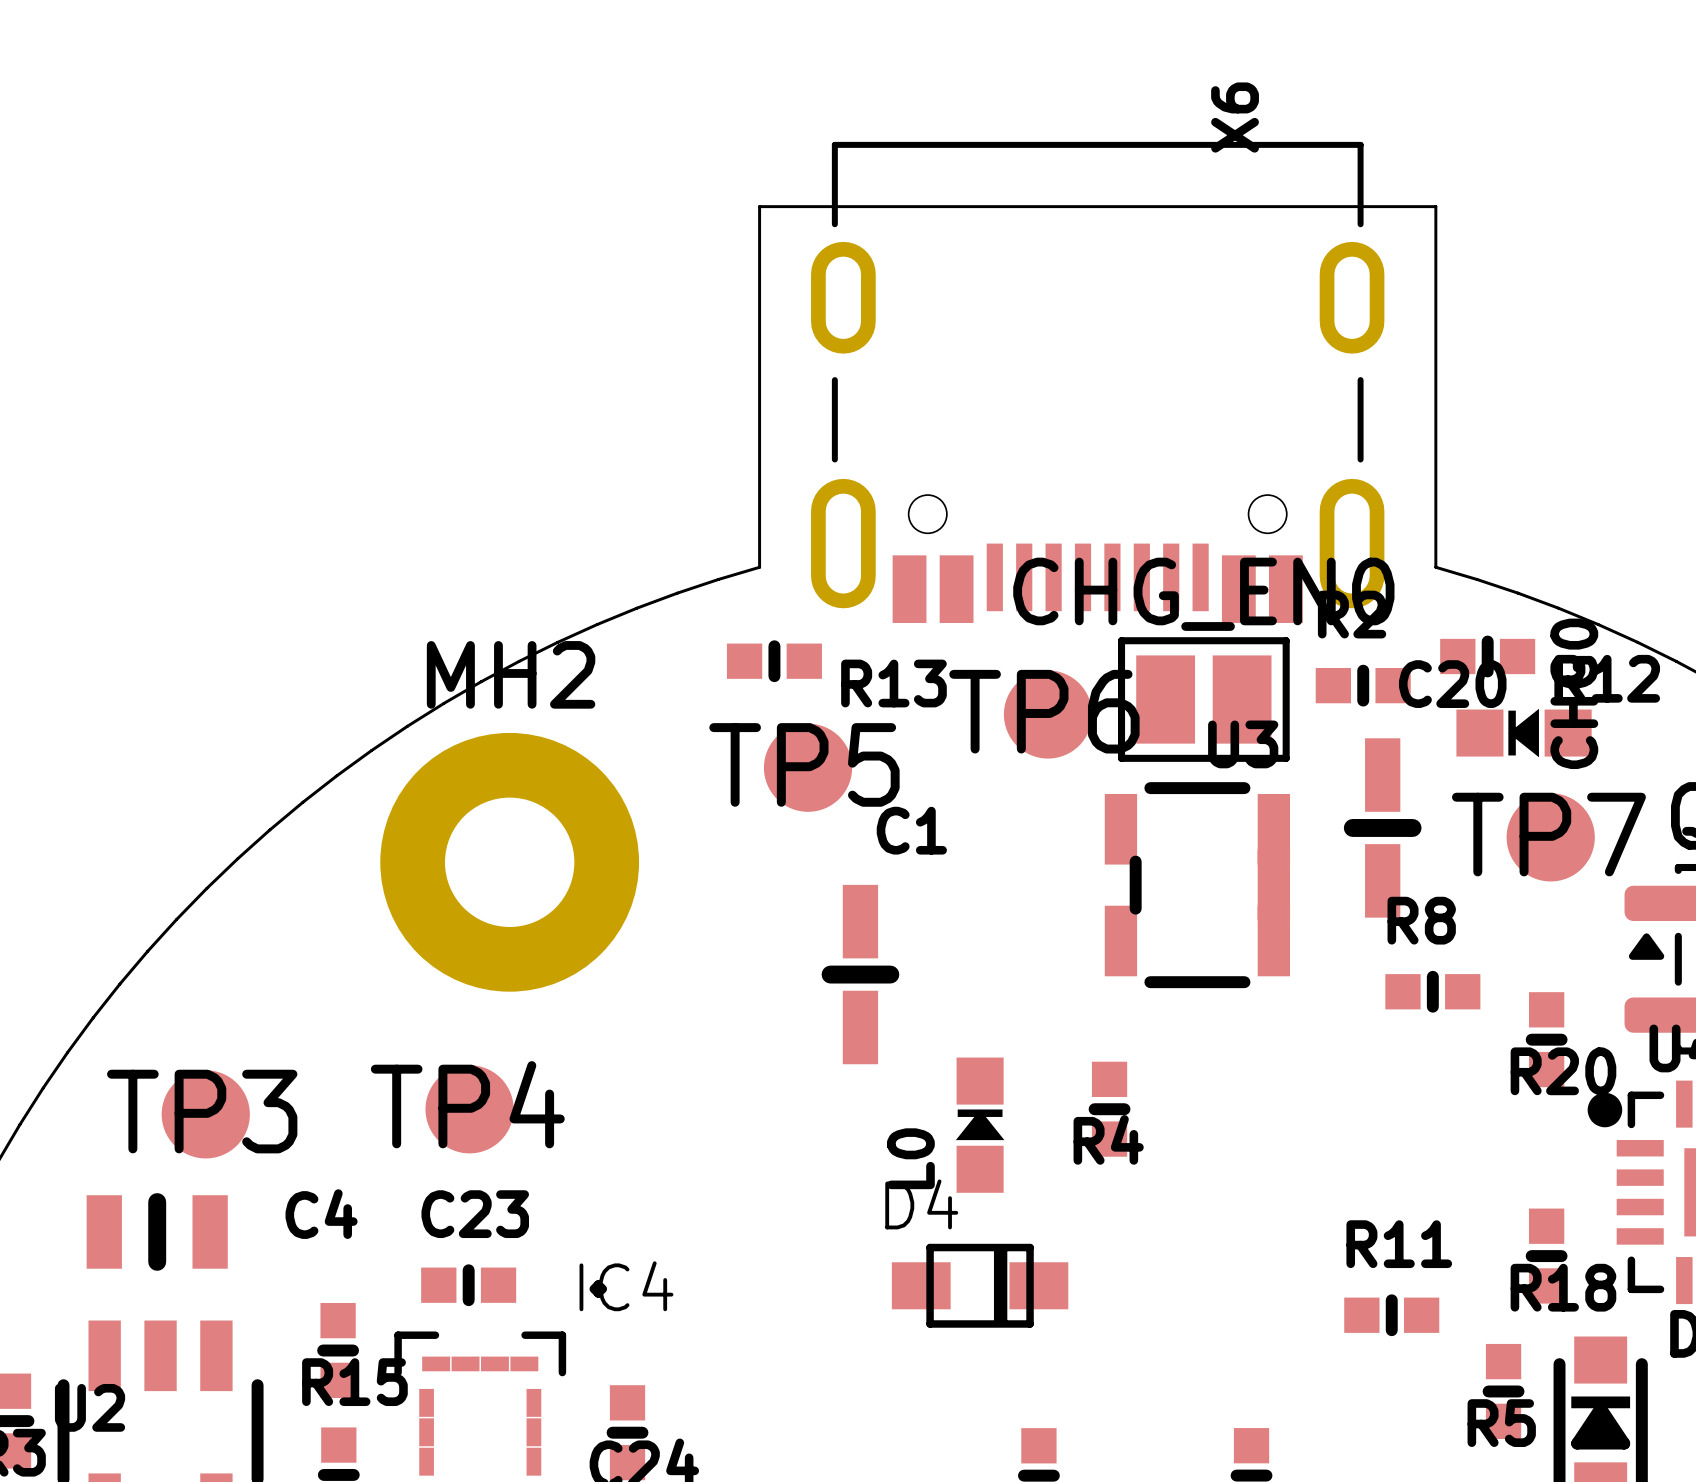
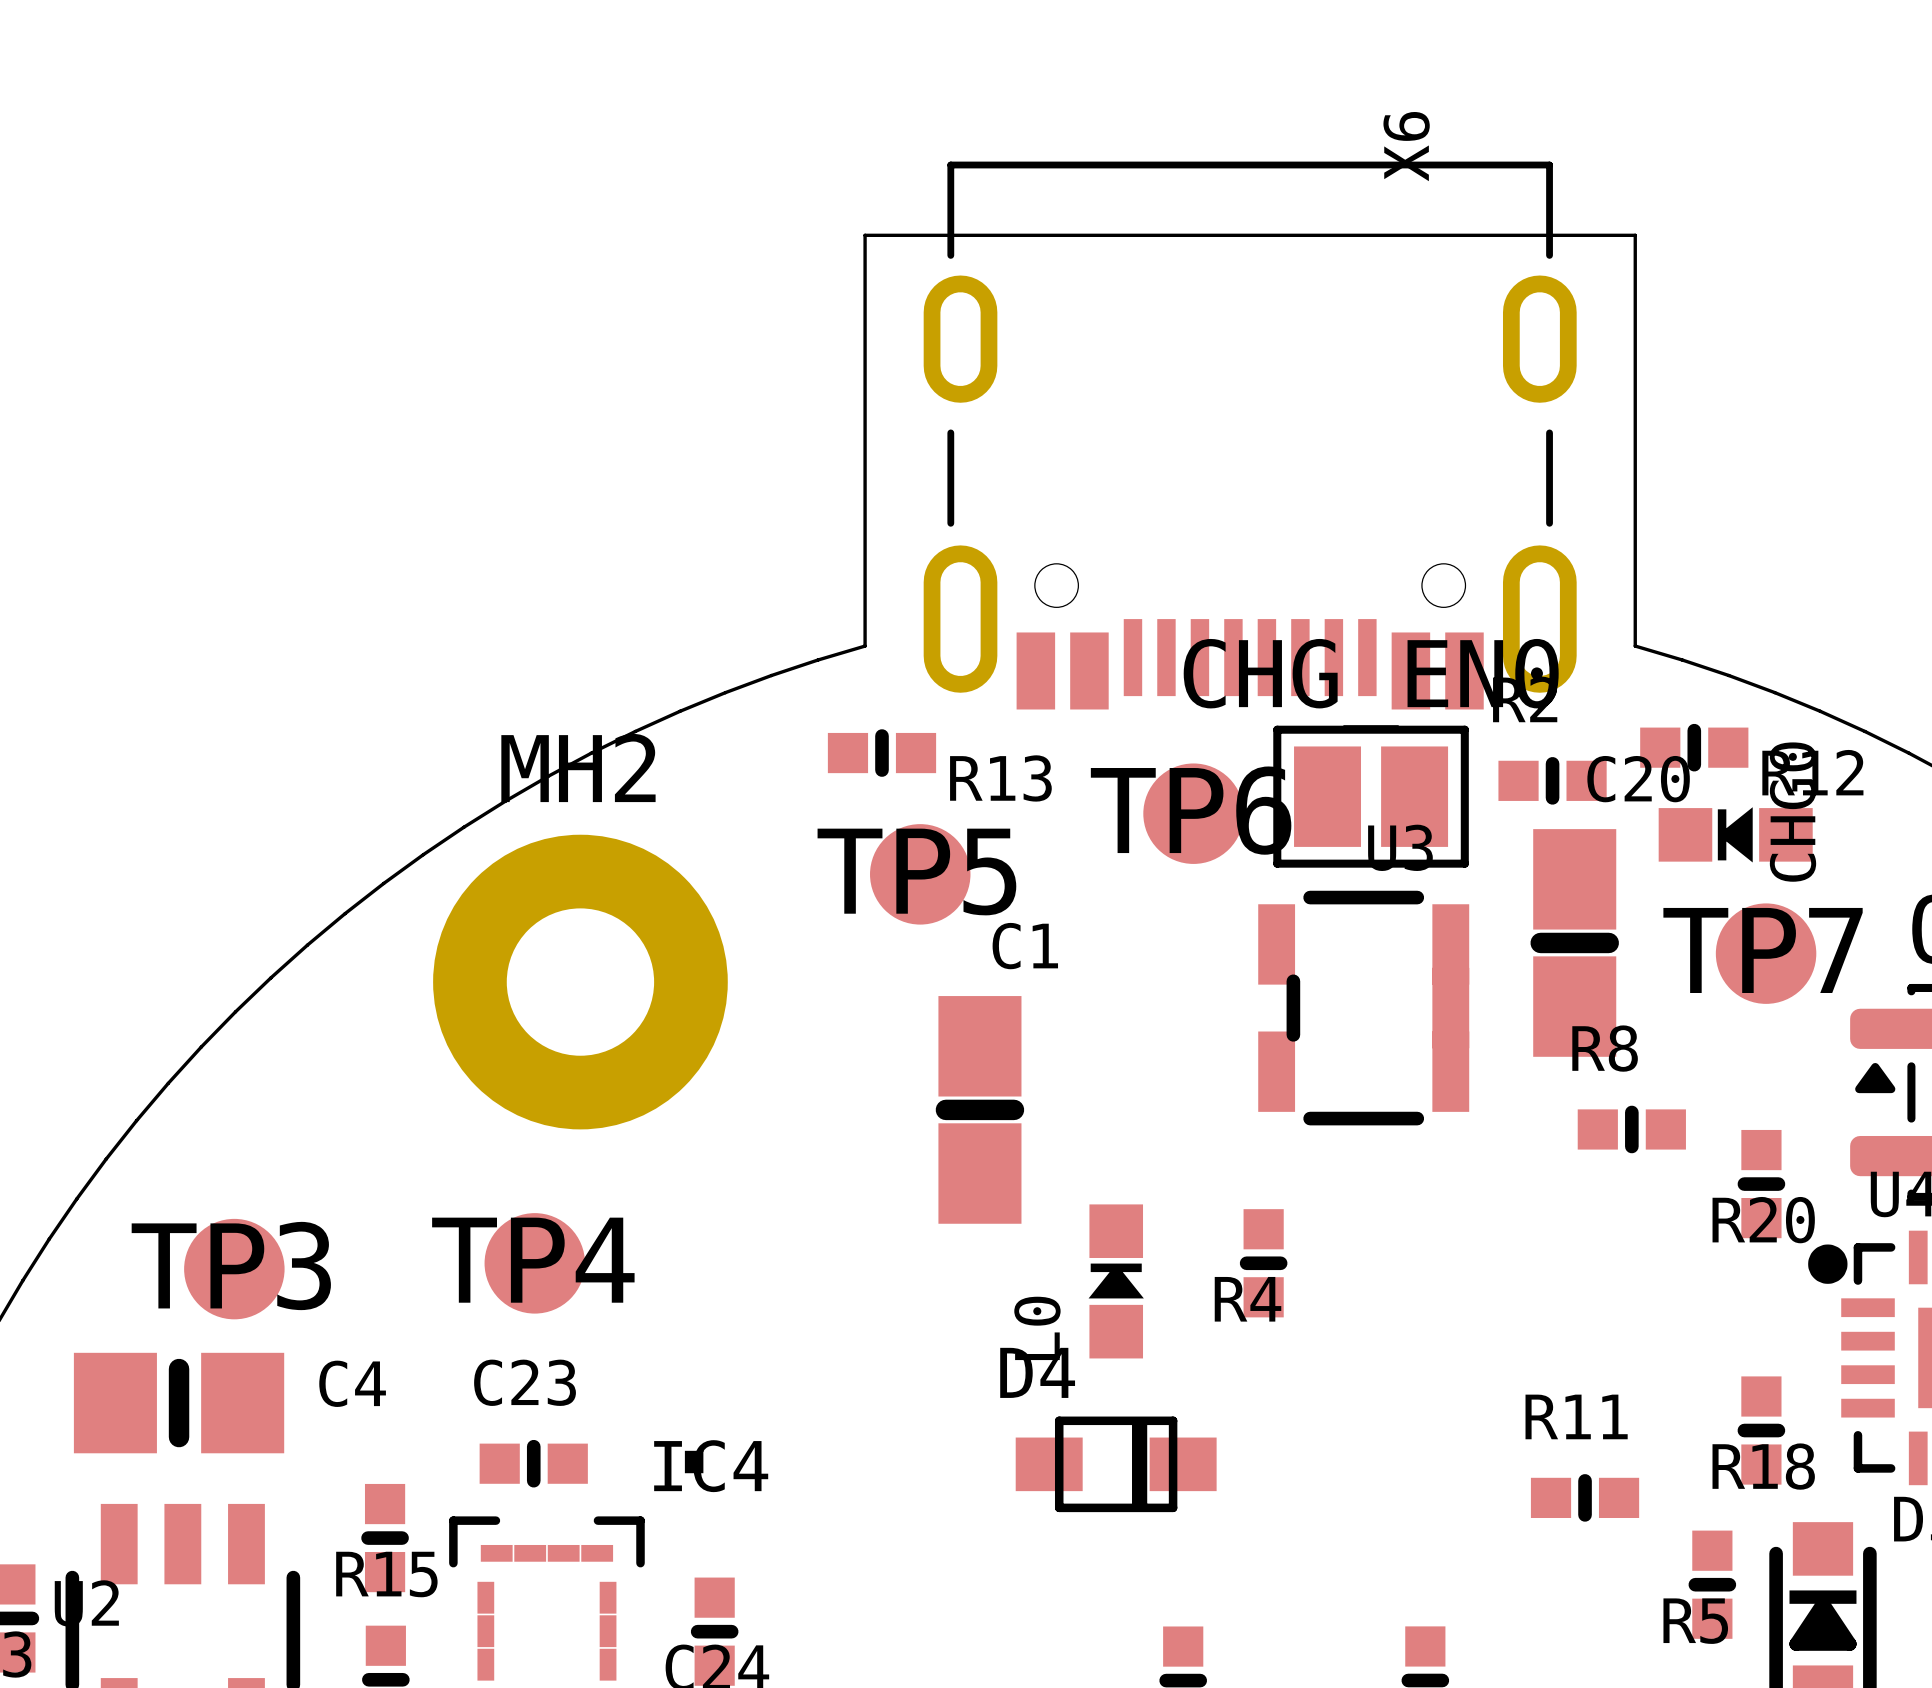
C20 footprint: [1343, 738, 1422, 918] -> [1530, 829, 1619, 1057]
C1 footprint: [821, 884, 900, 1065] -> [935, 996, 1025, 1224]
C4 footprint: [86, 1193, 228, 1271] -> [73, 1352, 285, 1454]

